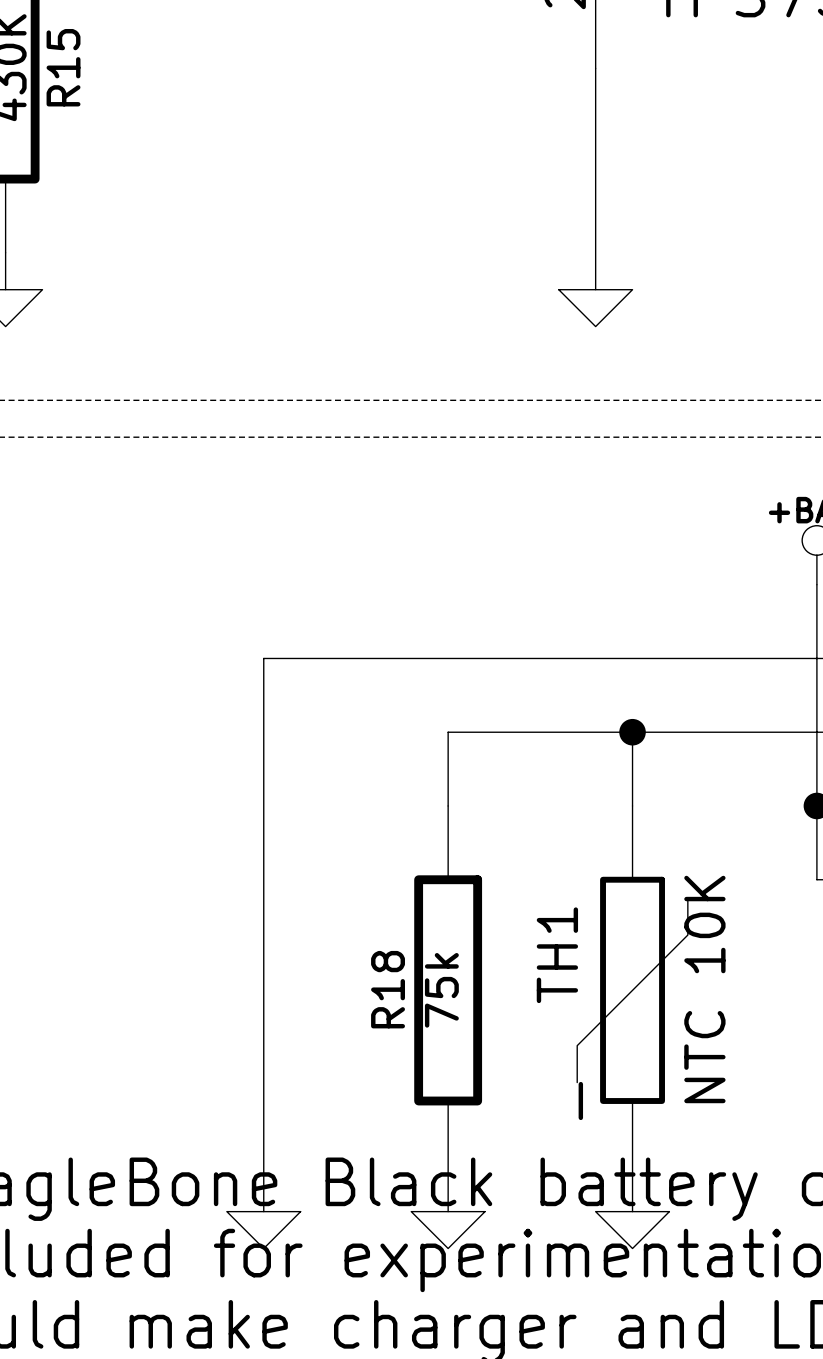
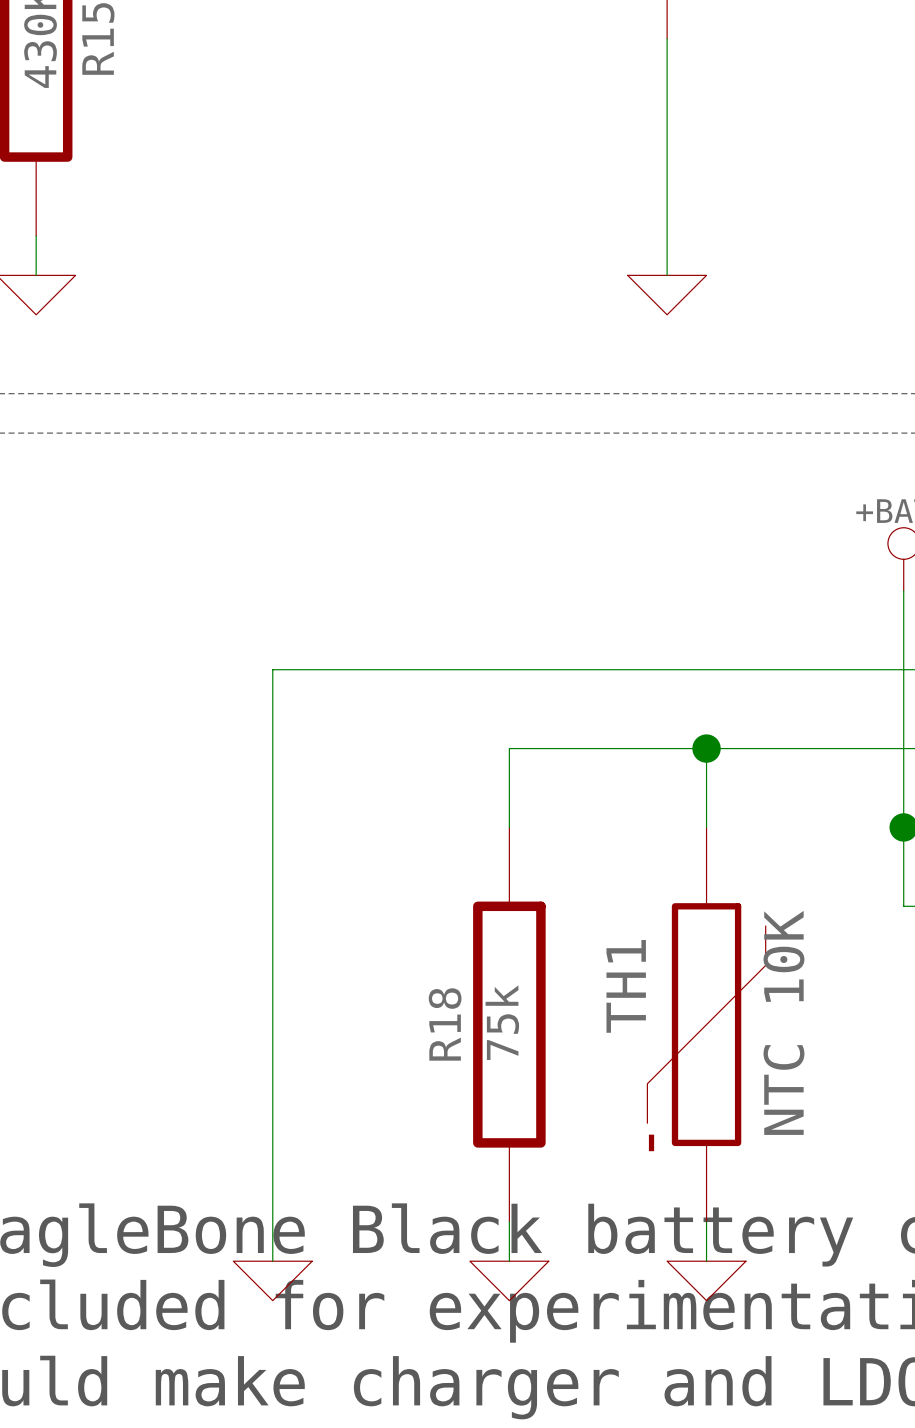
wire: (263, 658) (263, 1211) -> (312, 669) (272, 669) (272, 1261)
power symbol position: (263, 1230) -> (272, 1280)

